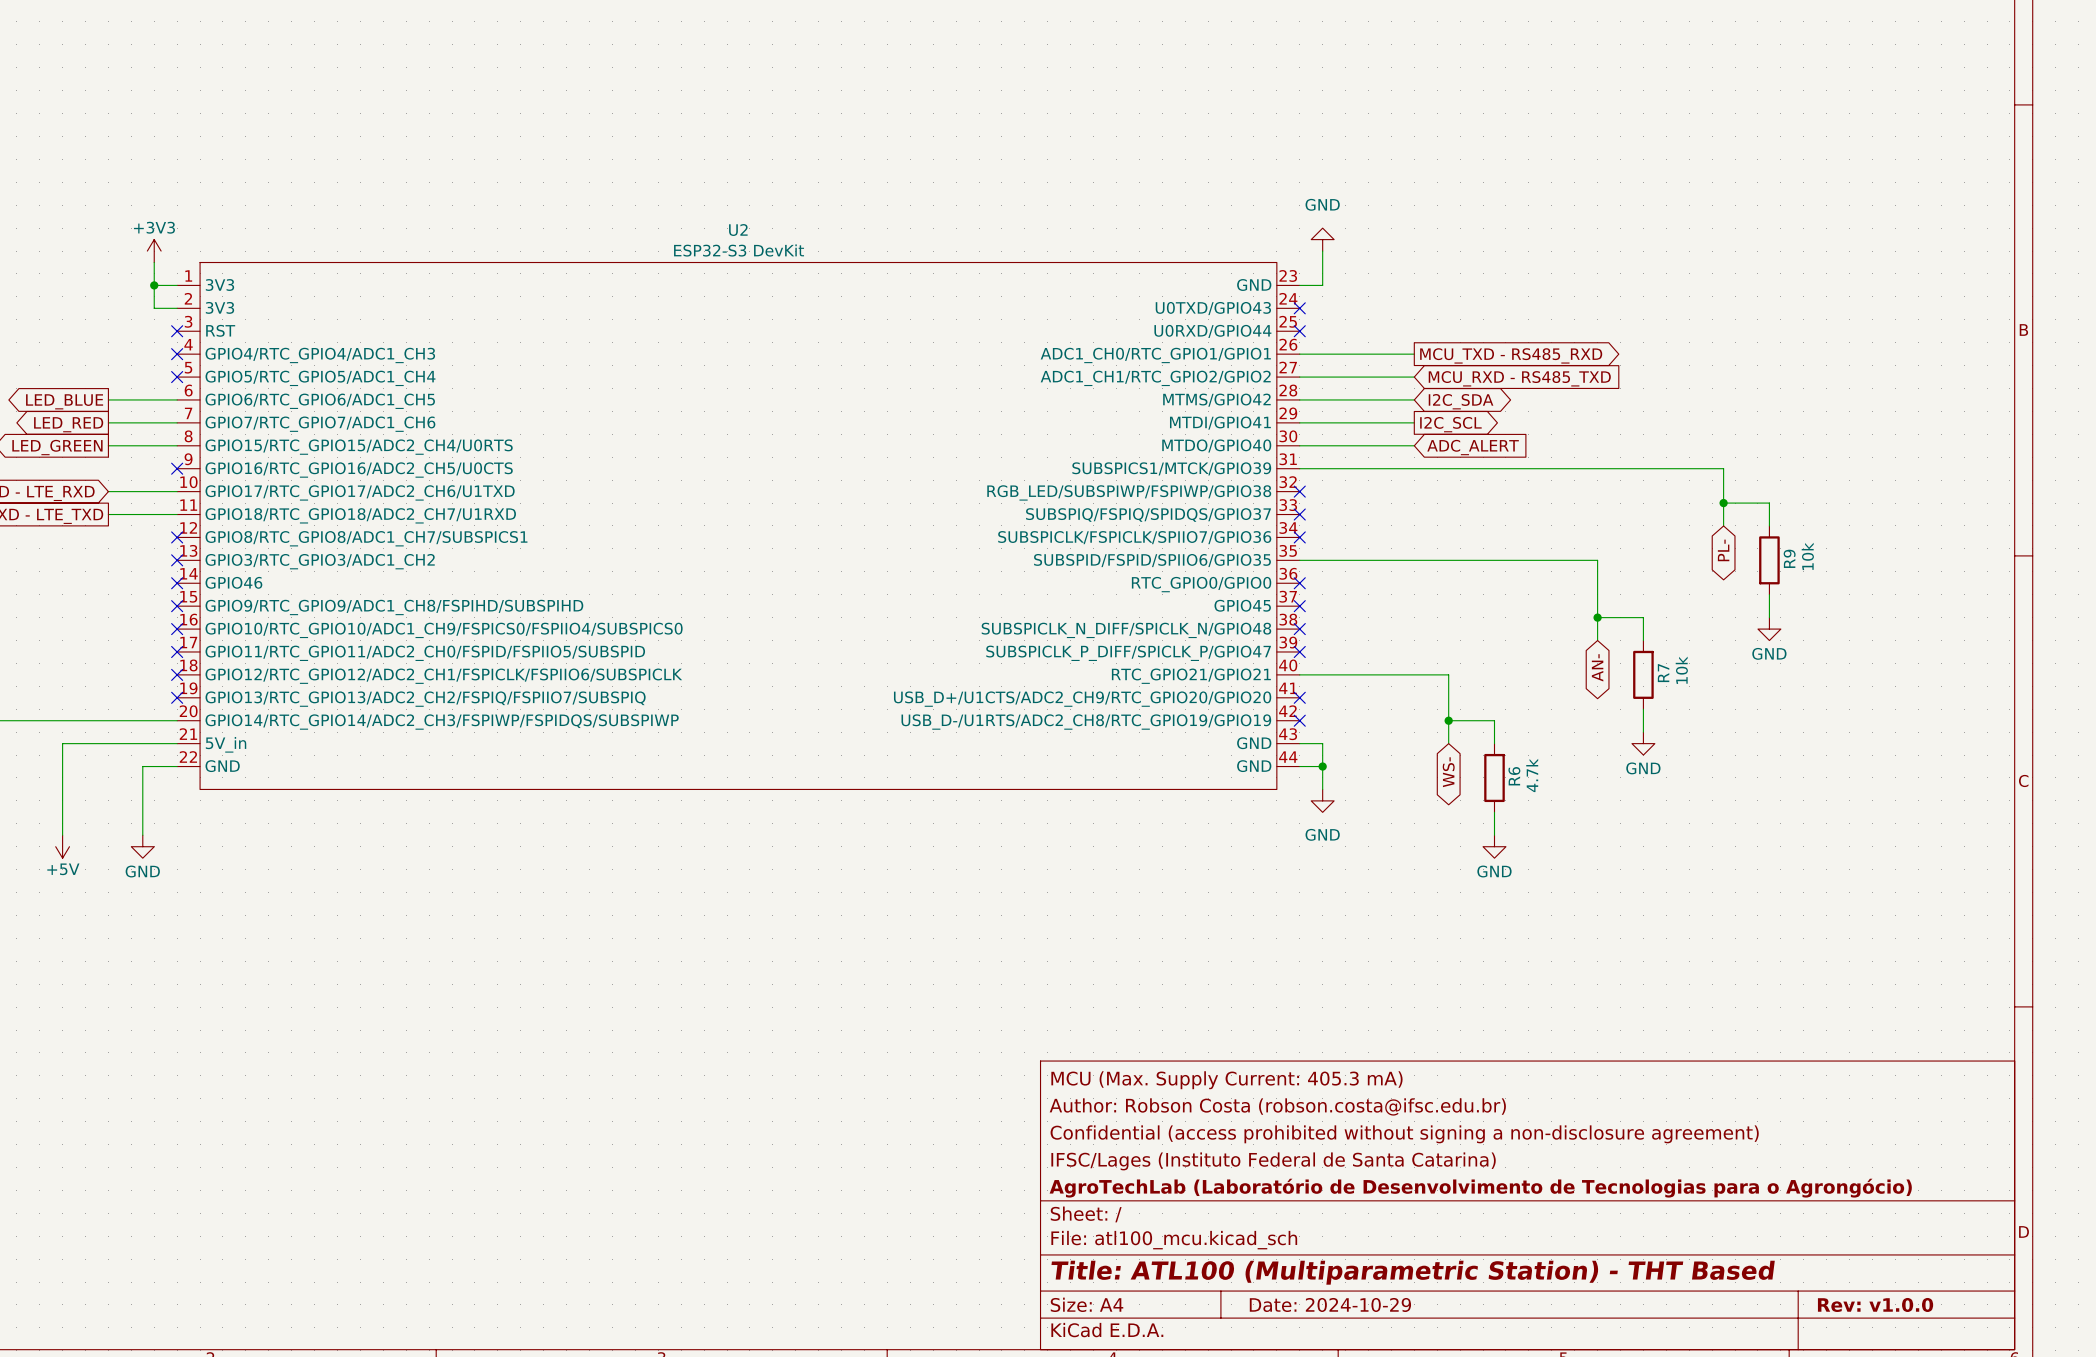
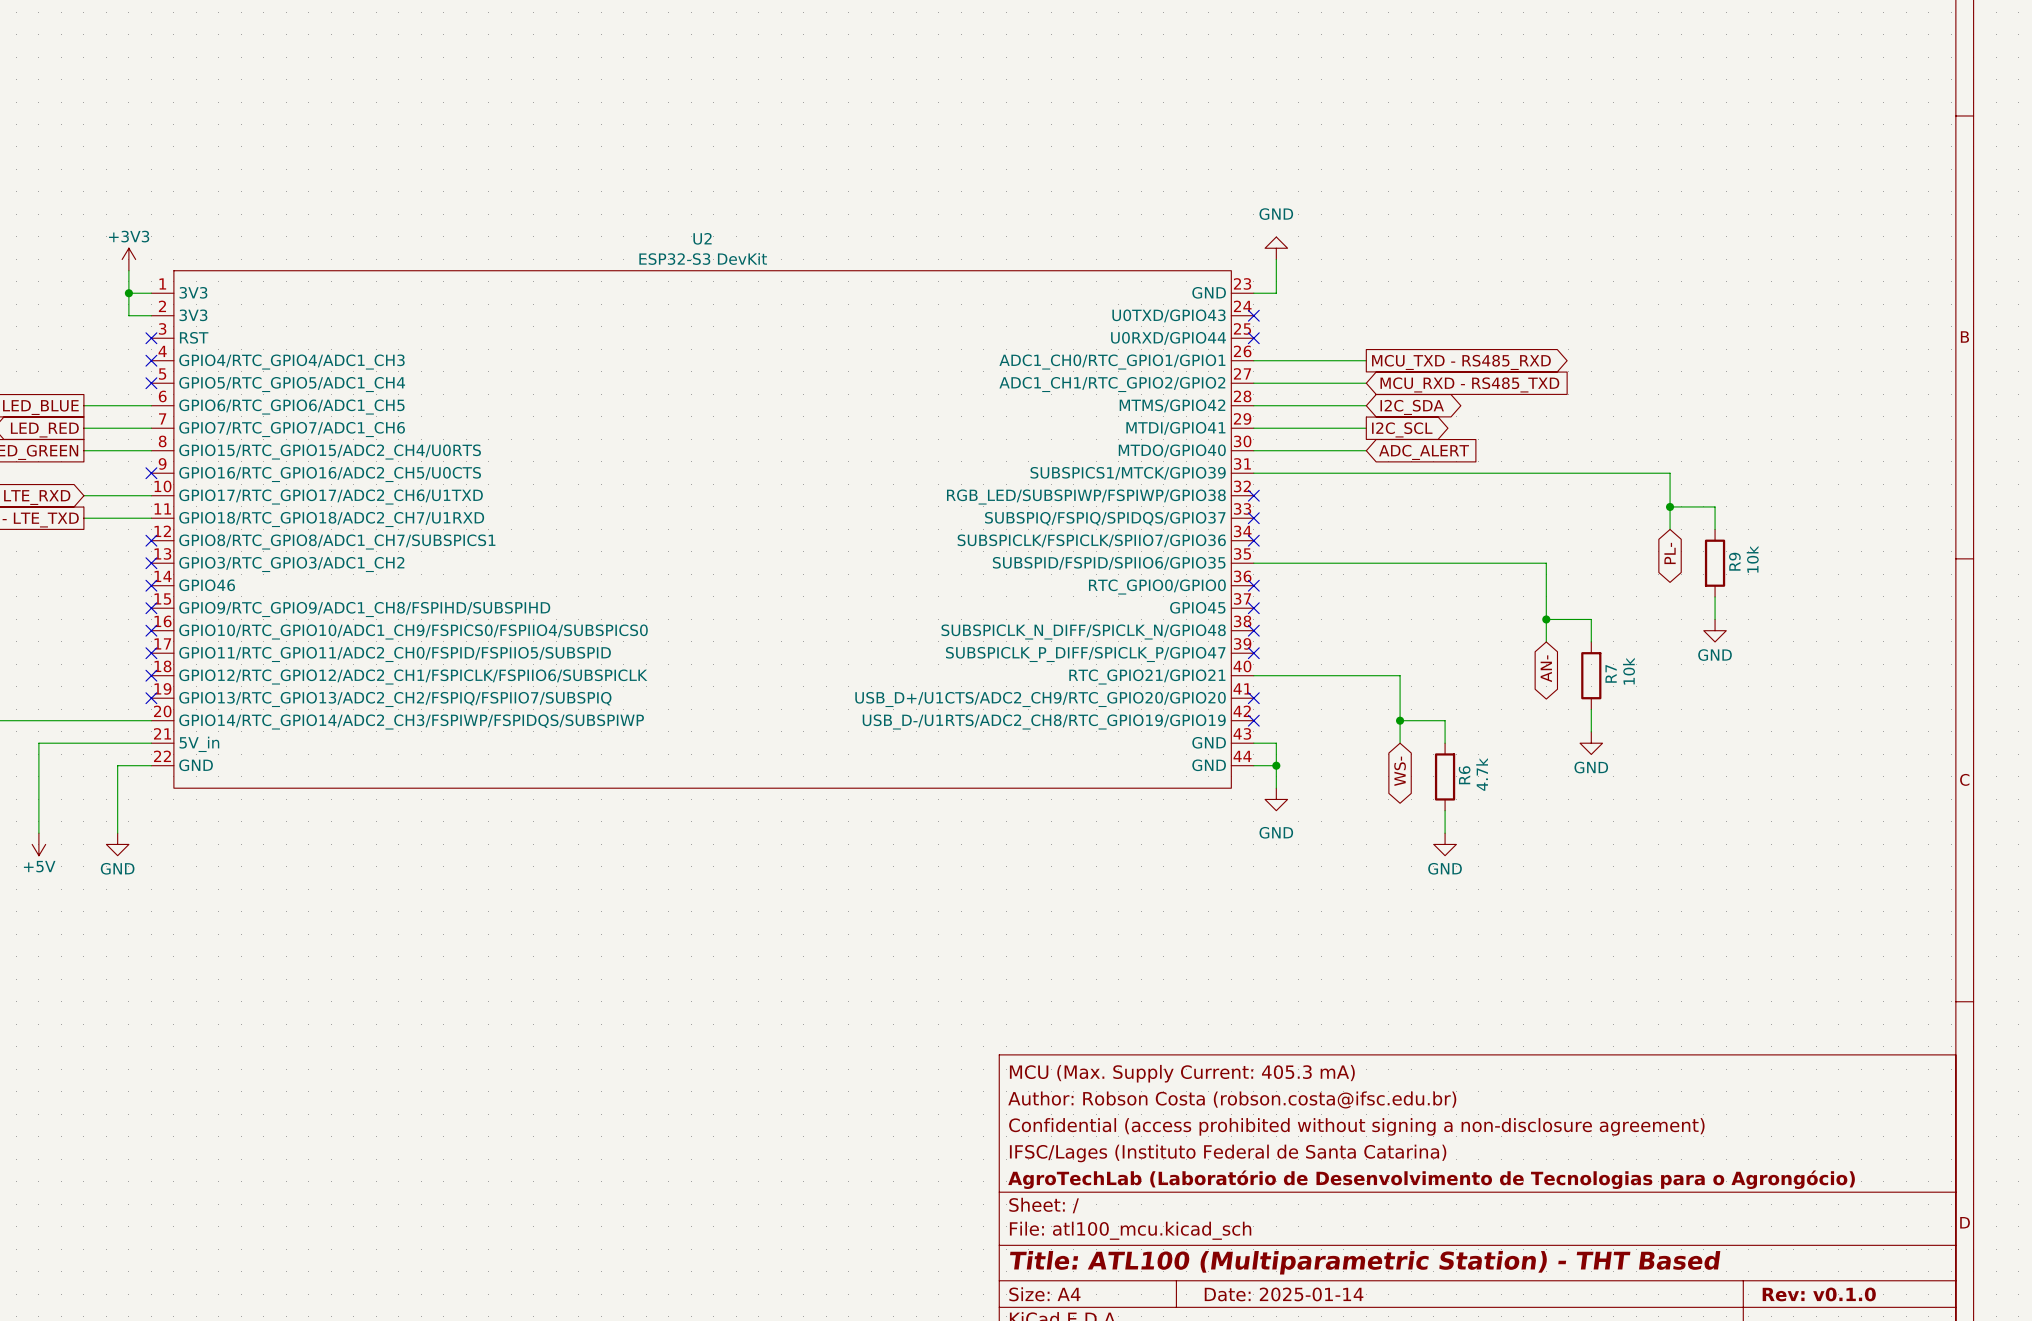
title block: Date: 2024-10-29 (1330, 1304) -> Date: 2025-01-14 (1284, 1294)
title block: Rev: v1.0.0 (1875, 1304) -> Rev: v0.1.0 (1819, 1294)

